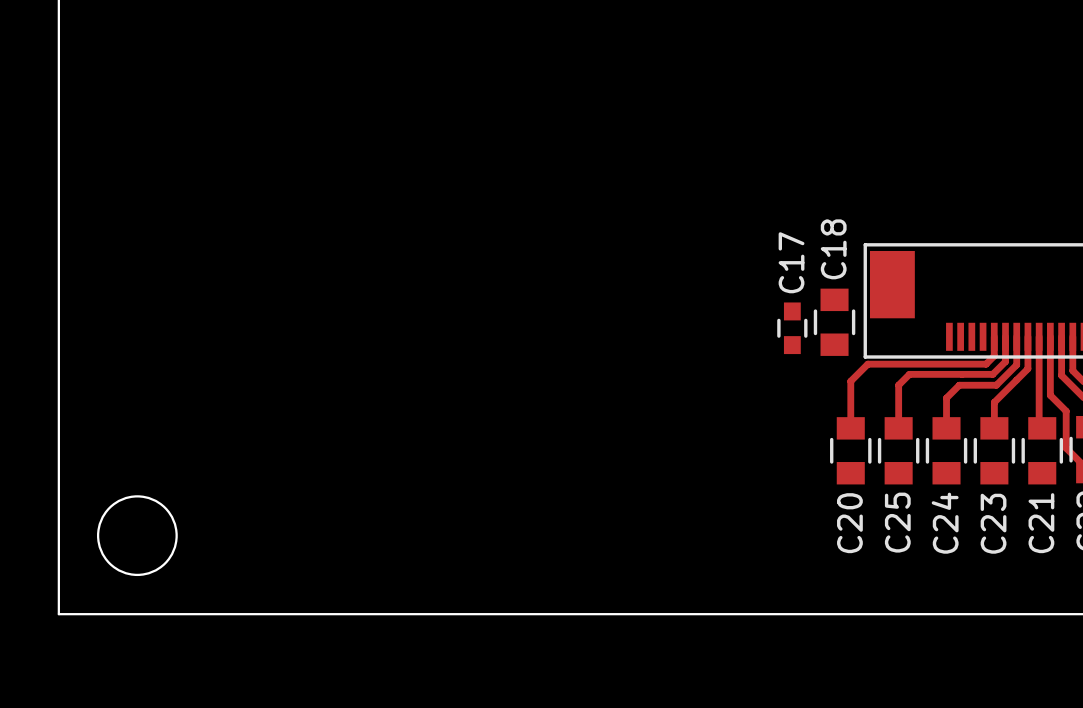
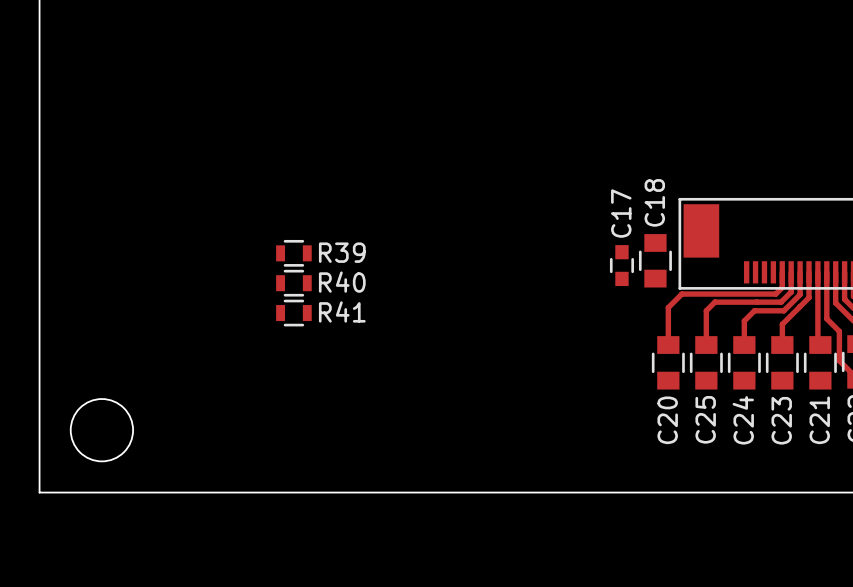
R39: none -> (293, 253)
R40: none -> (293, 283)
R41: none -> (293, 313)

